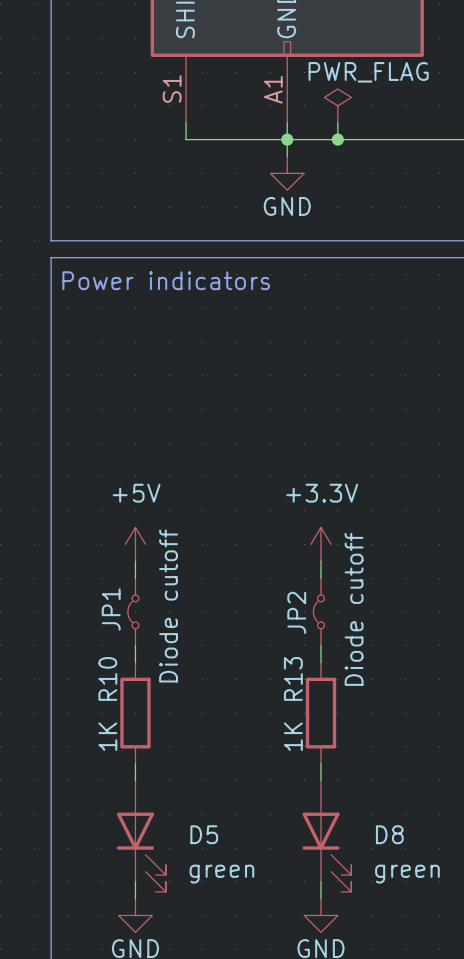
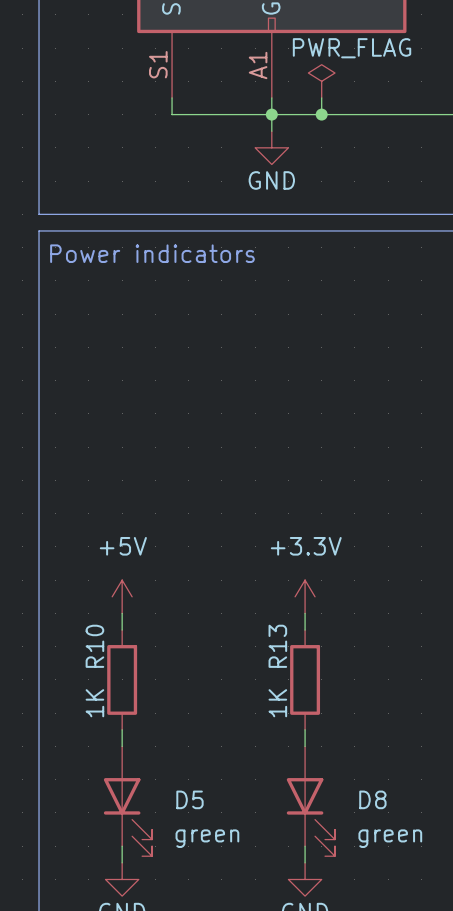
power symbol position: +5V (135, 544) -> +5V (122, 596)
power symbol position: +3.3V (320, 544) -> +3.3V (305, 596)
wire: (135, 561) (135, 578) -> none
wire: (320, 561) (320, 578) -> none
JP1: Diode cutoff (133, 611) -> none
JP2: Diode cutoff (318, 611) -> none

